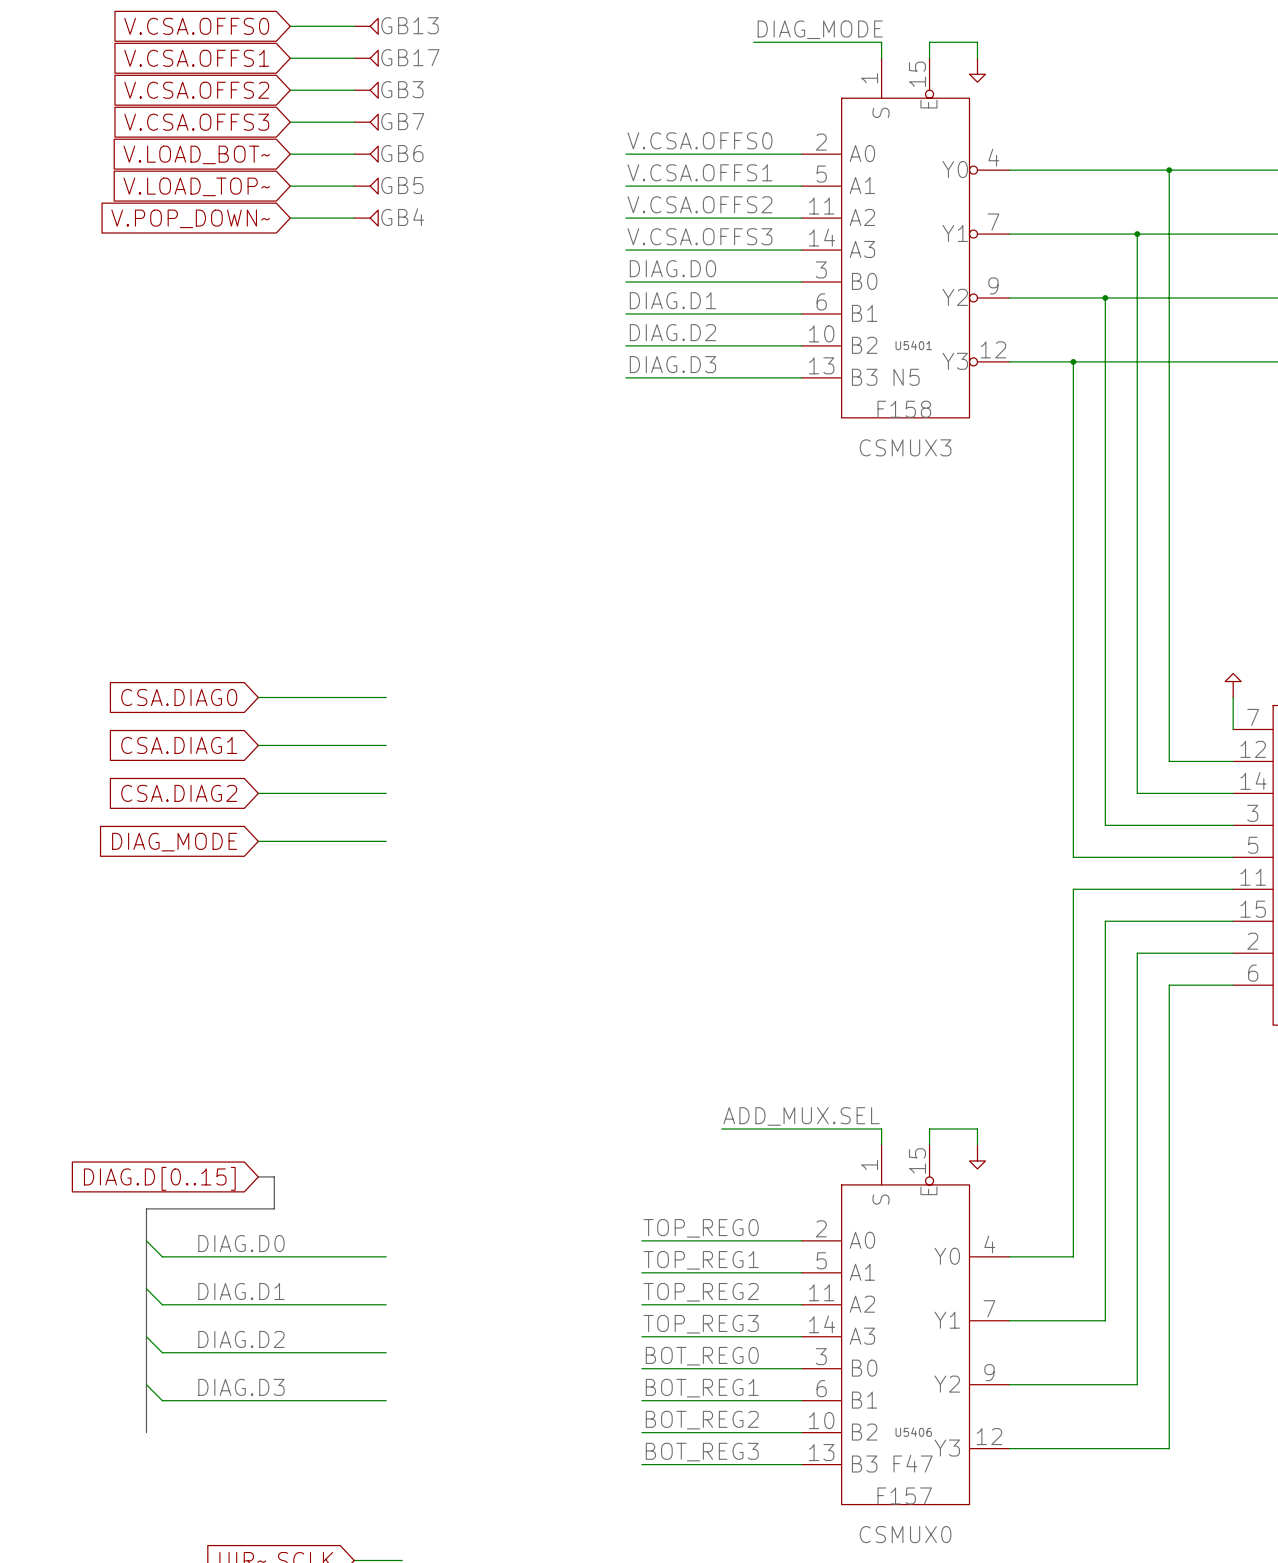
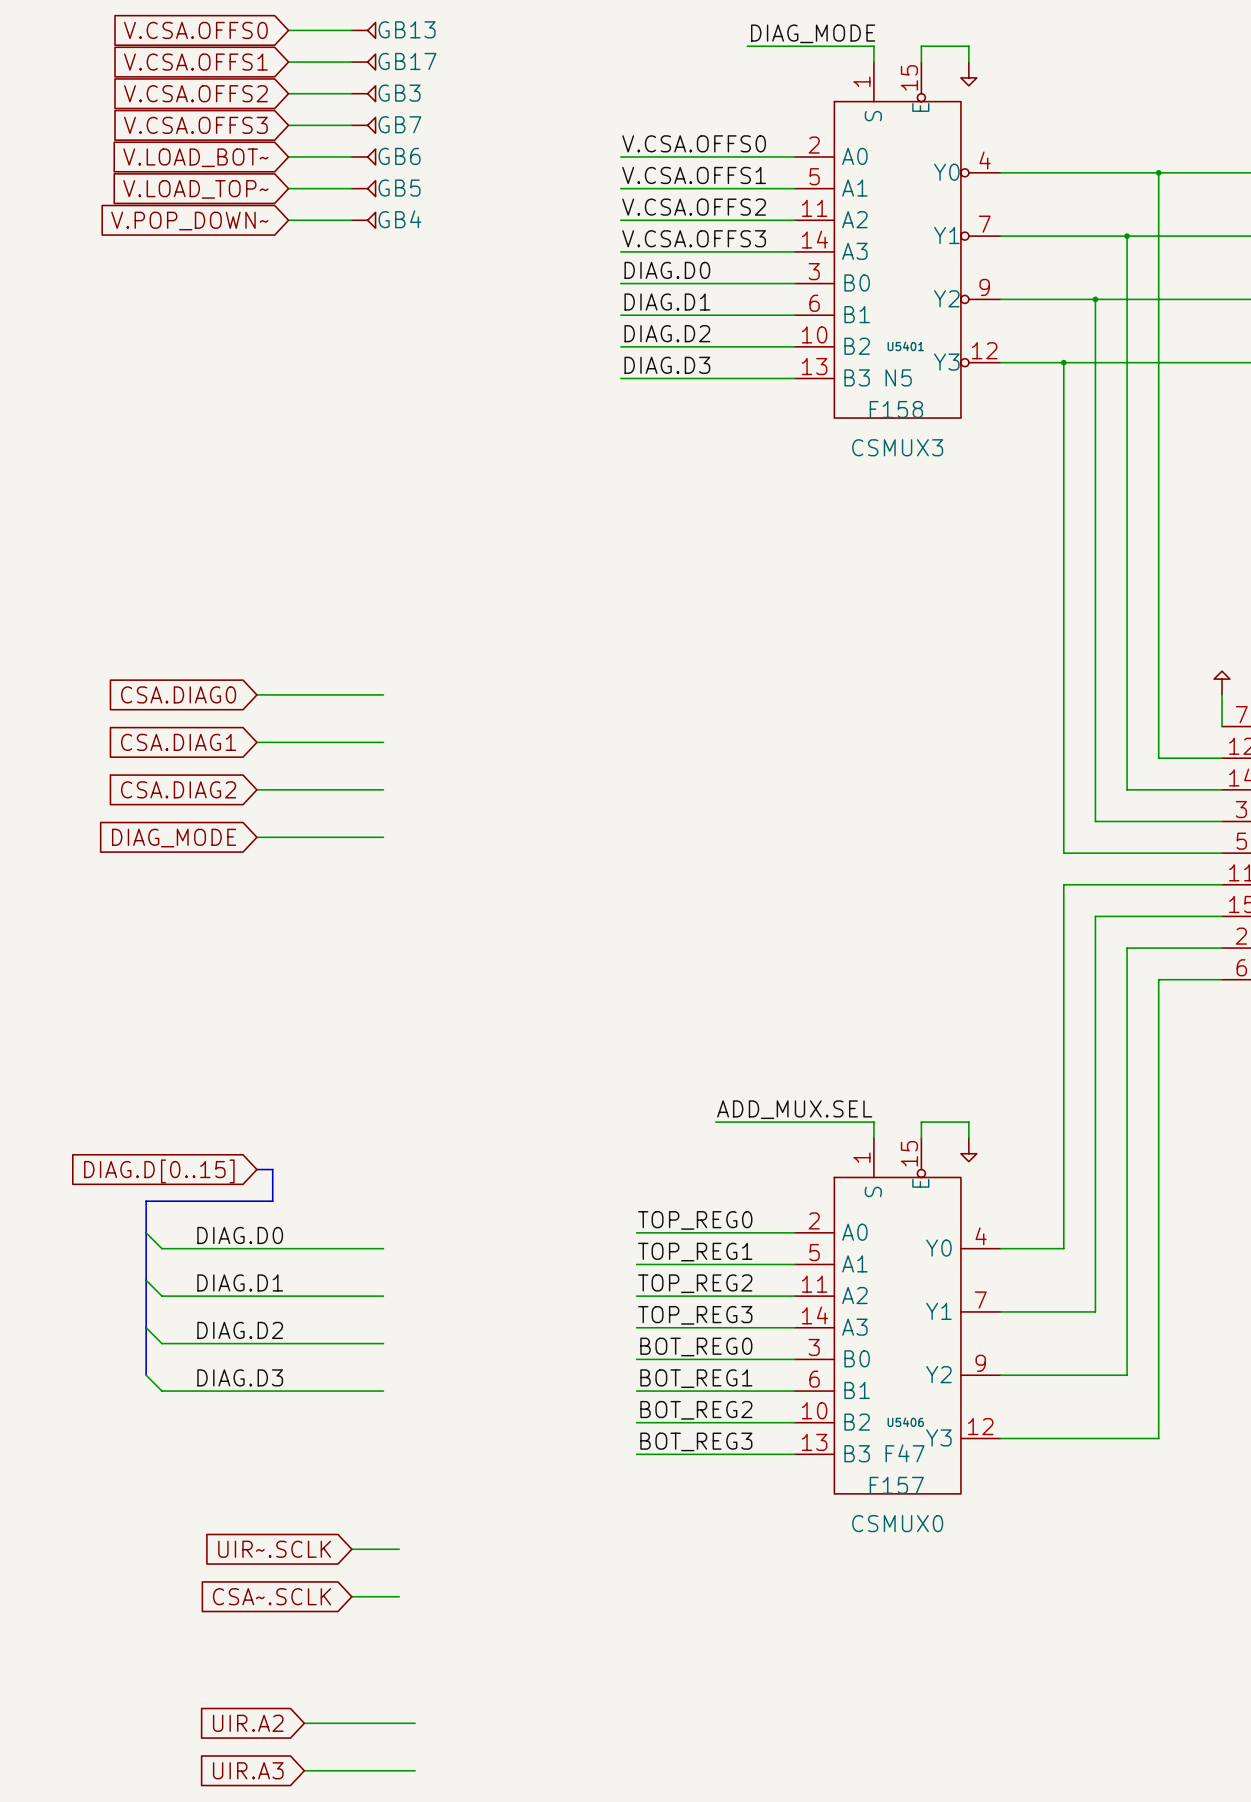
bus: (146, 1384) (146, 1432) -> none

